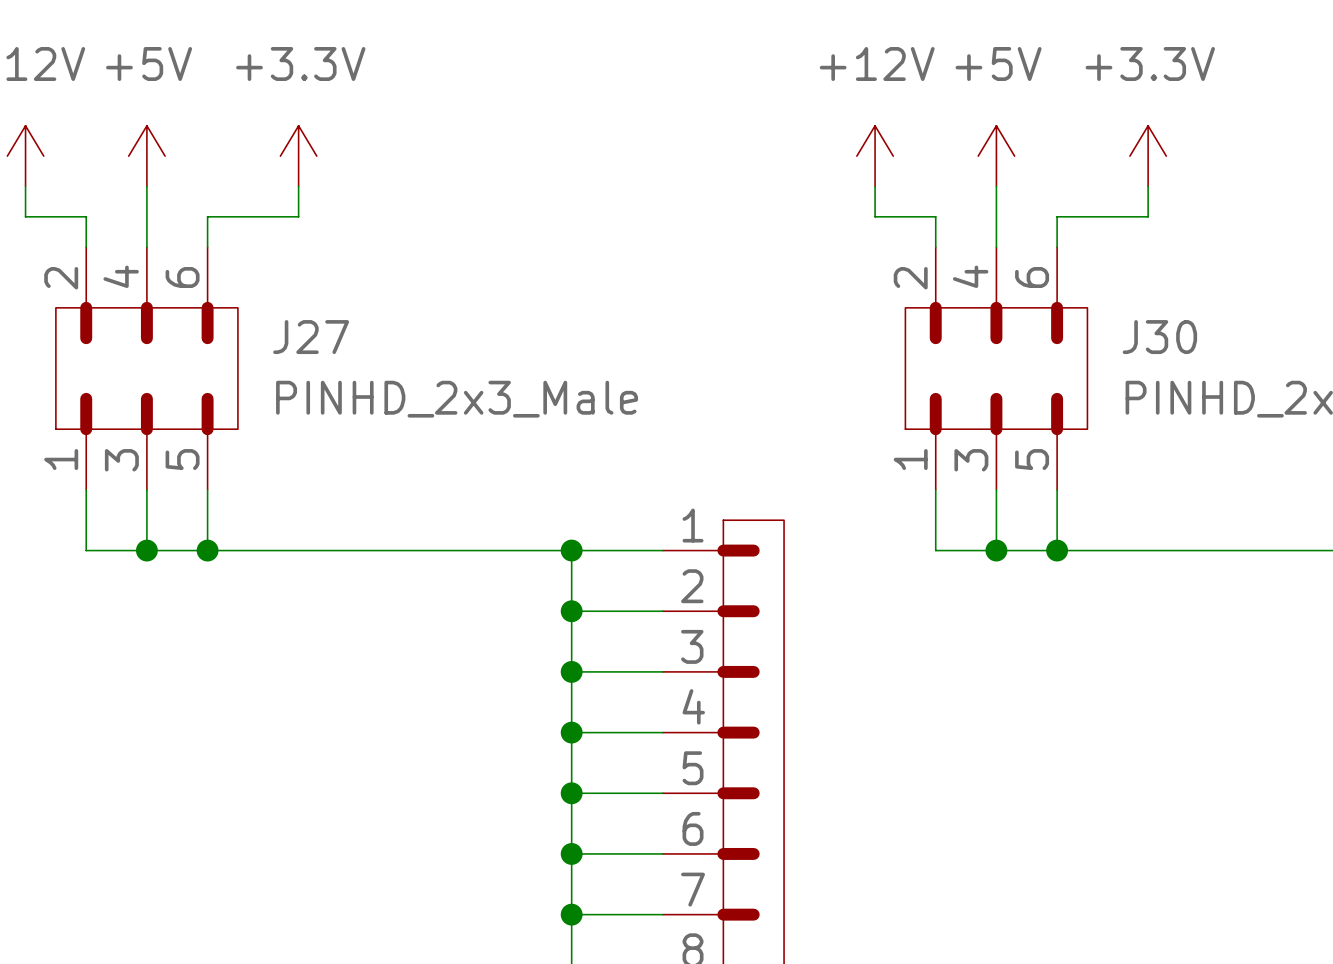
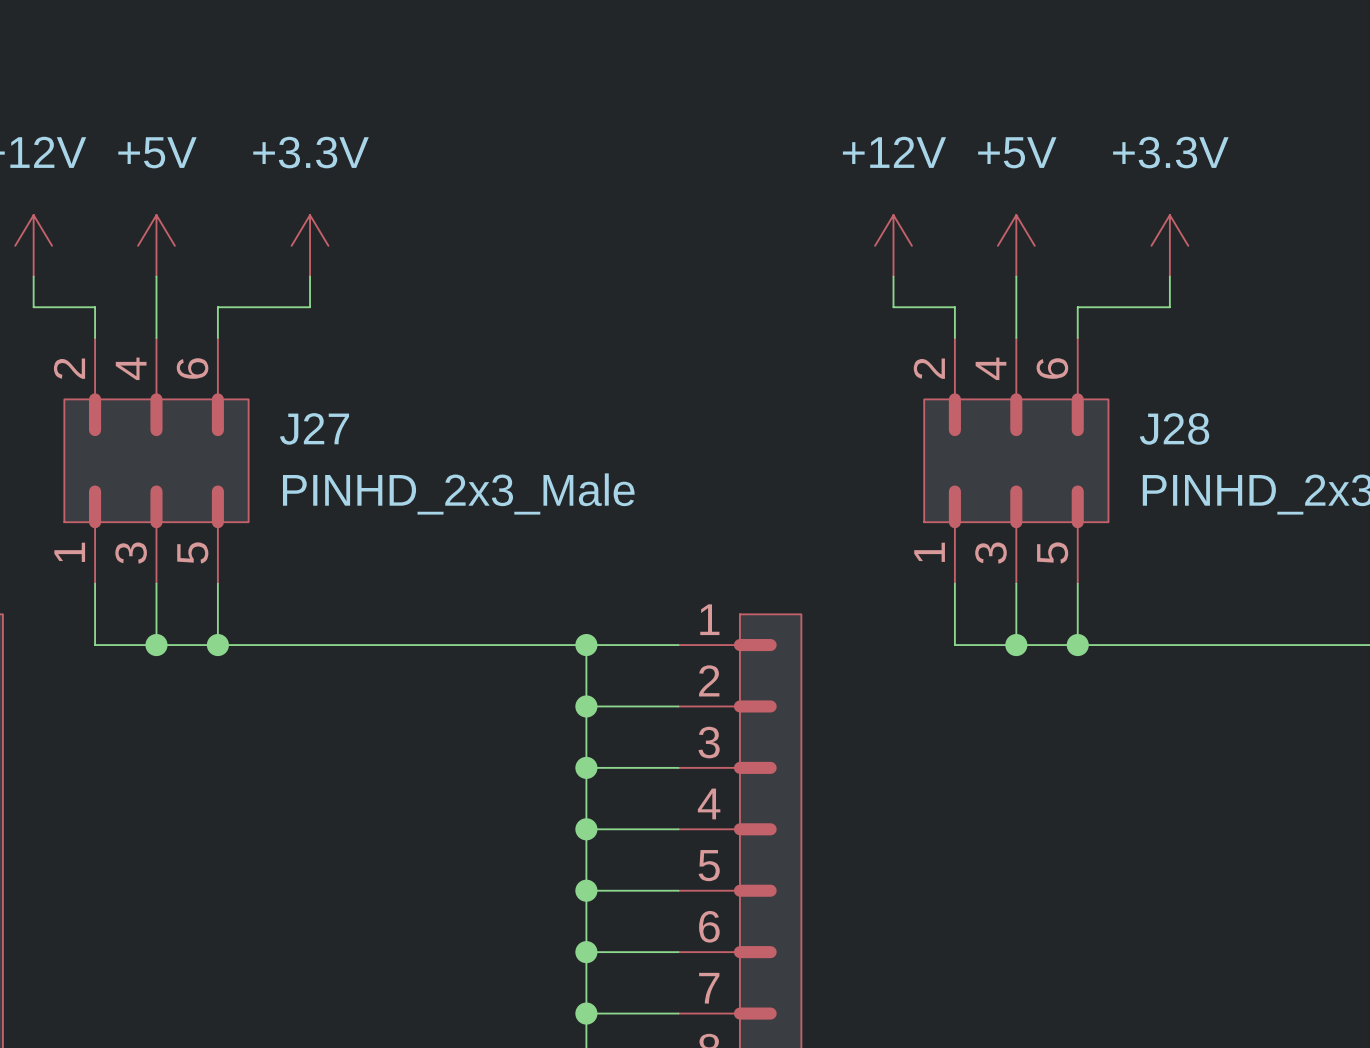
J30 name: J30 (1159, 337) -> J28 (1174, 428)

